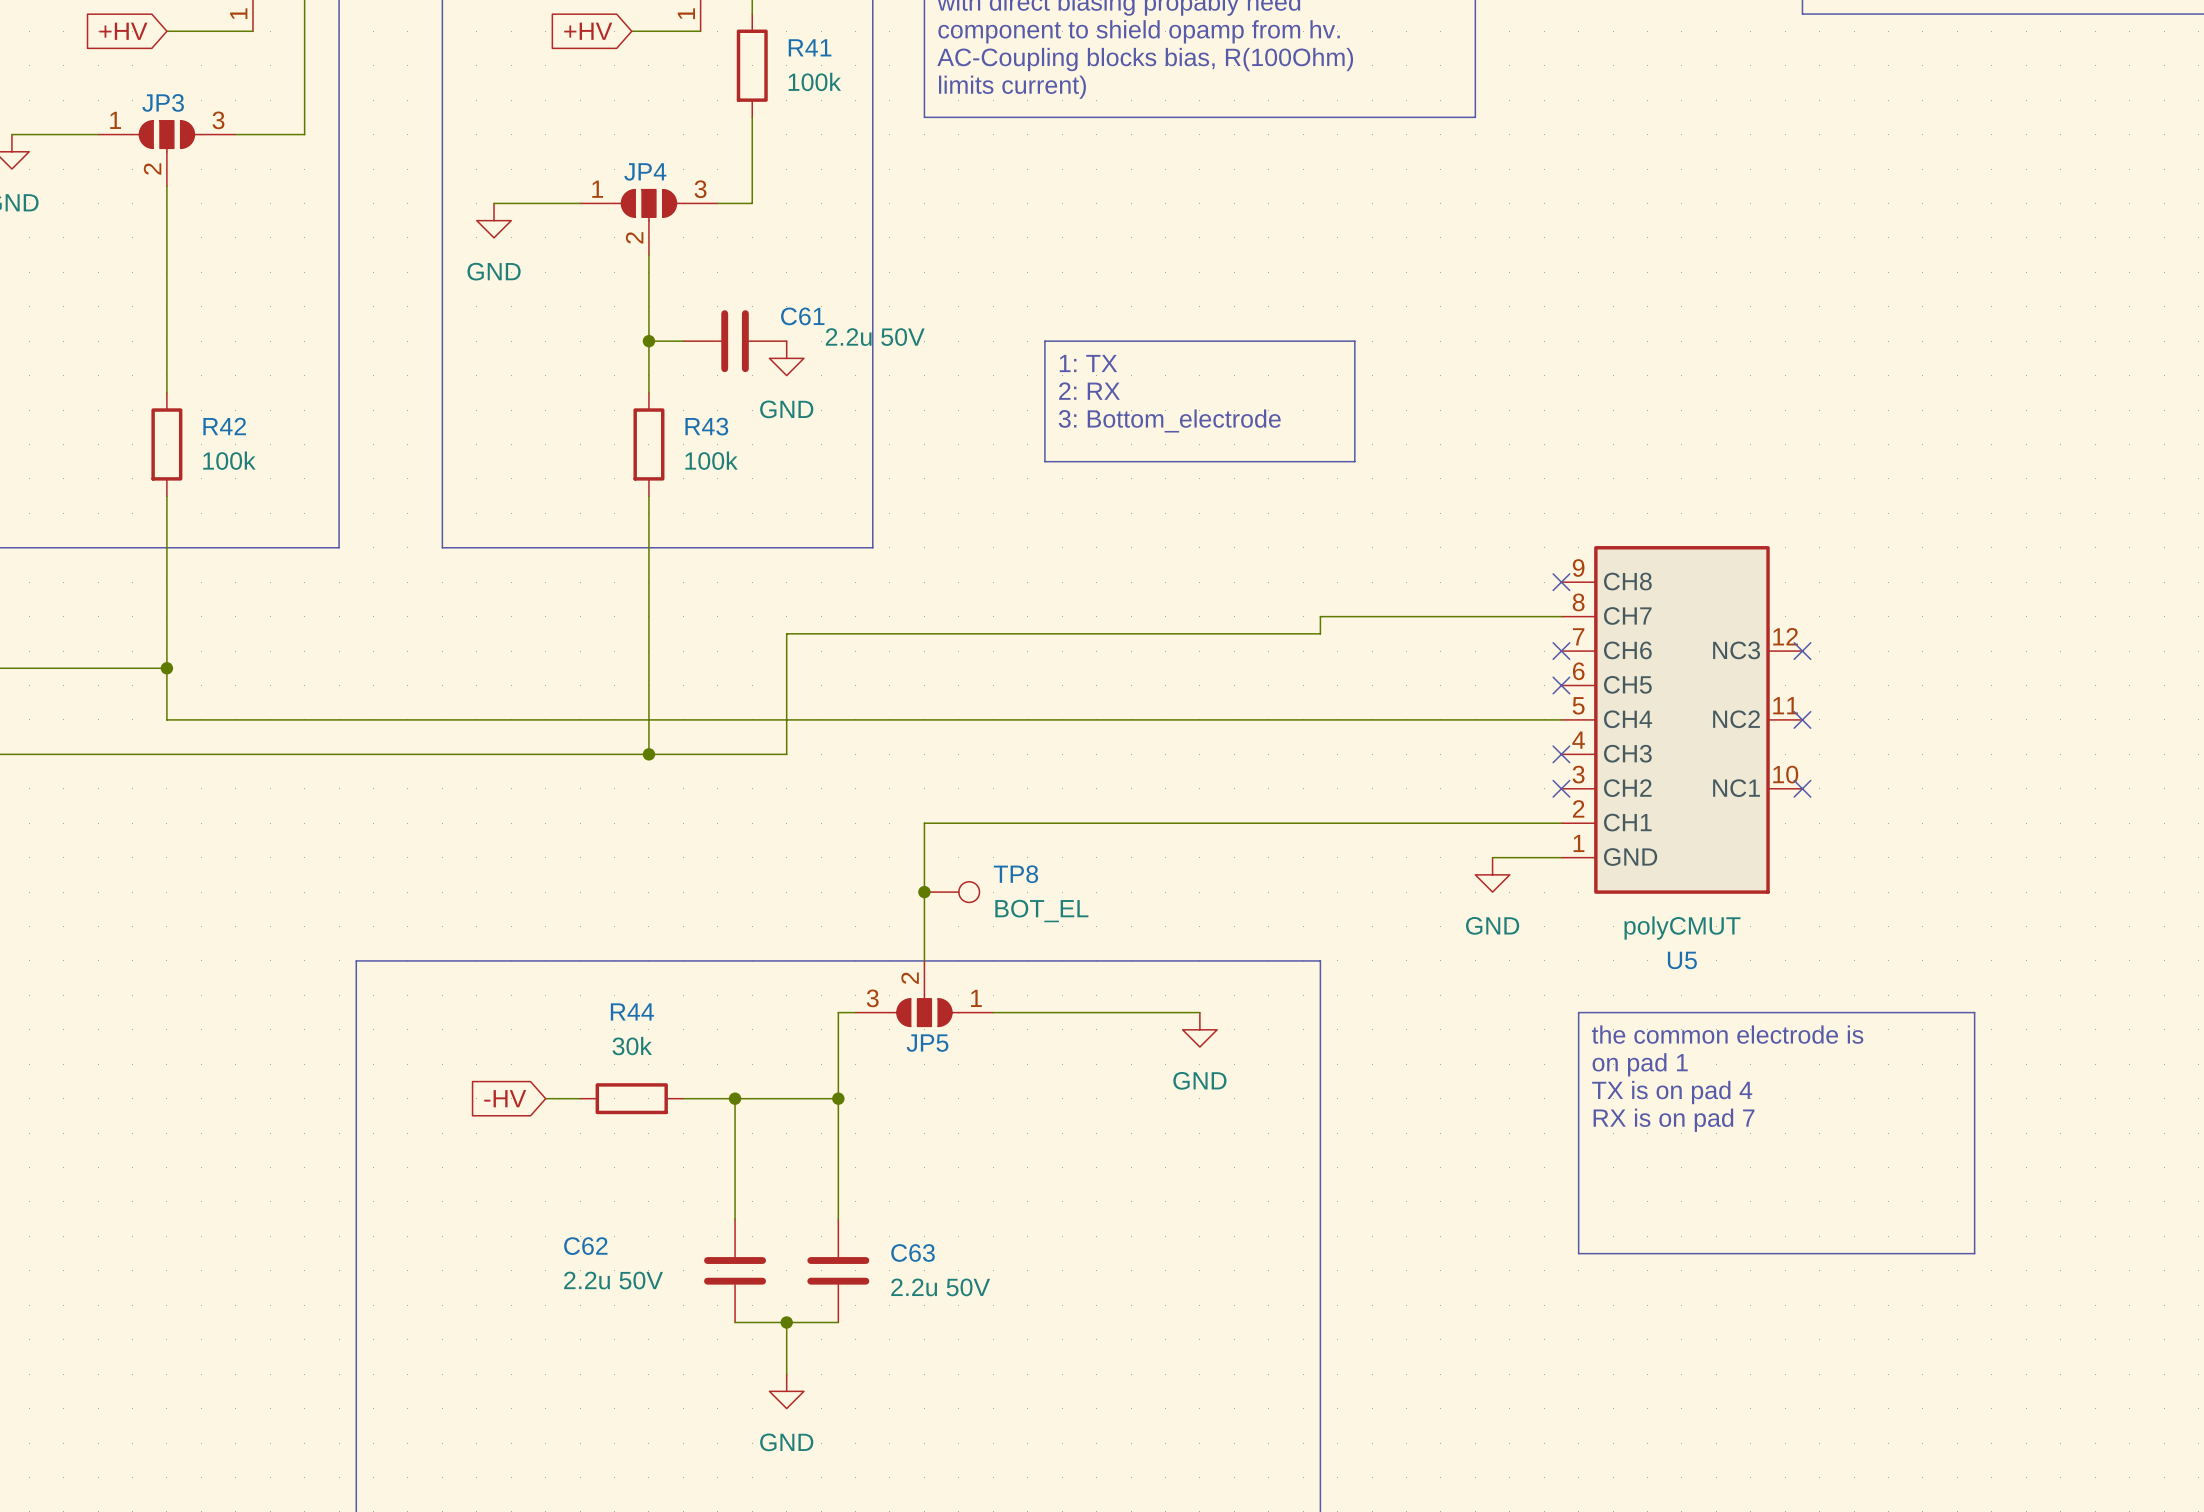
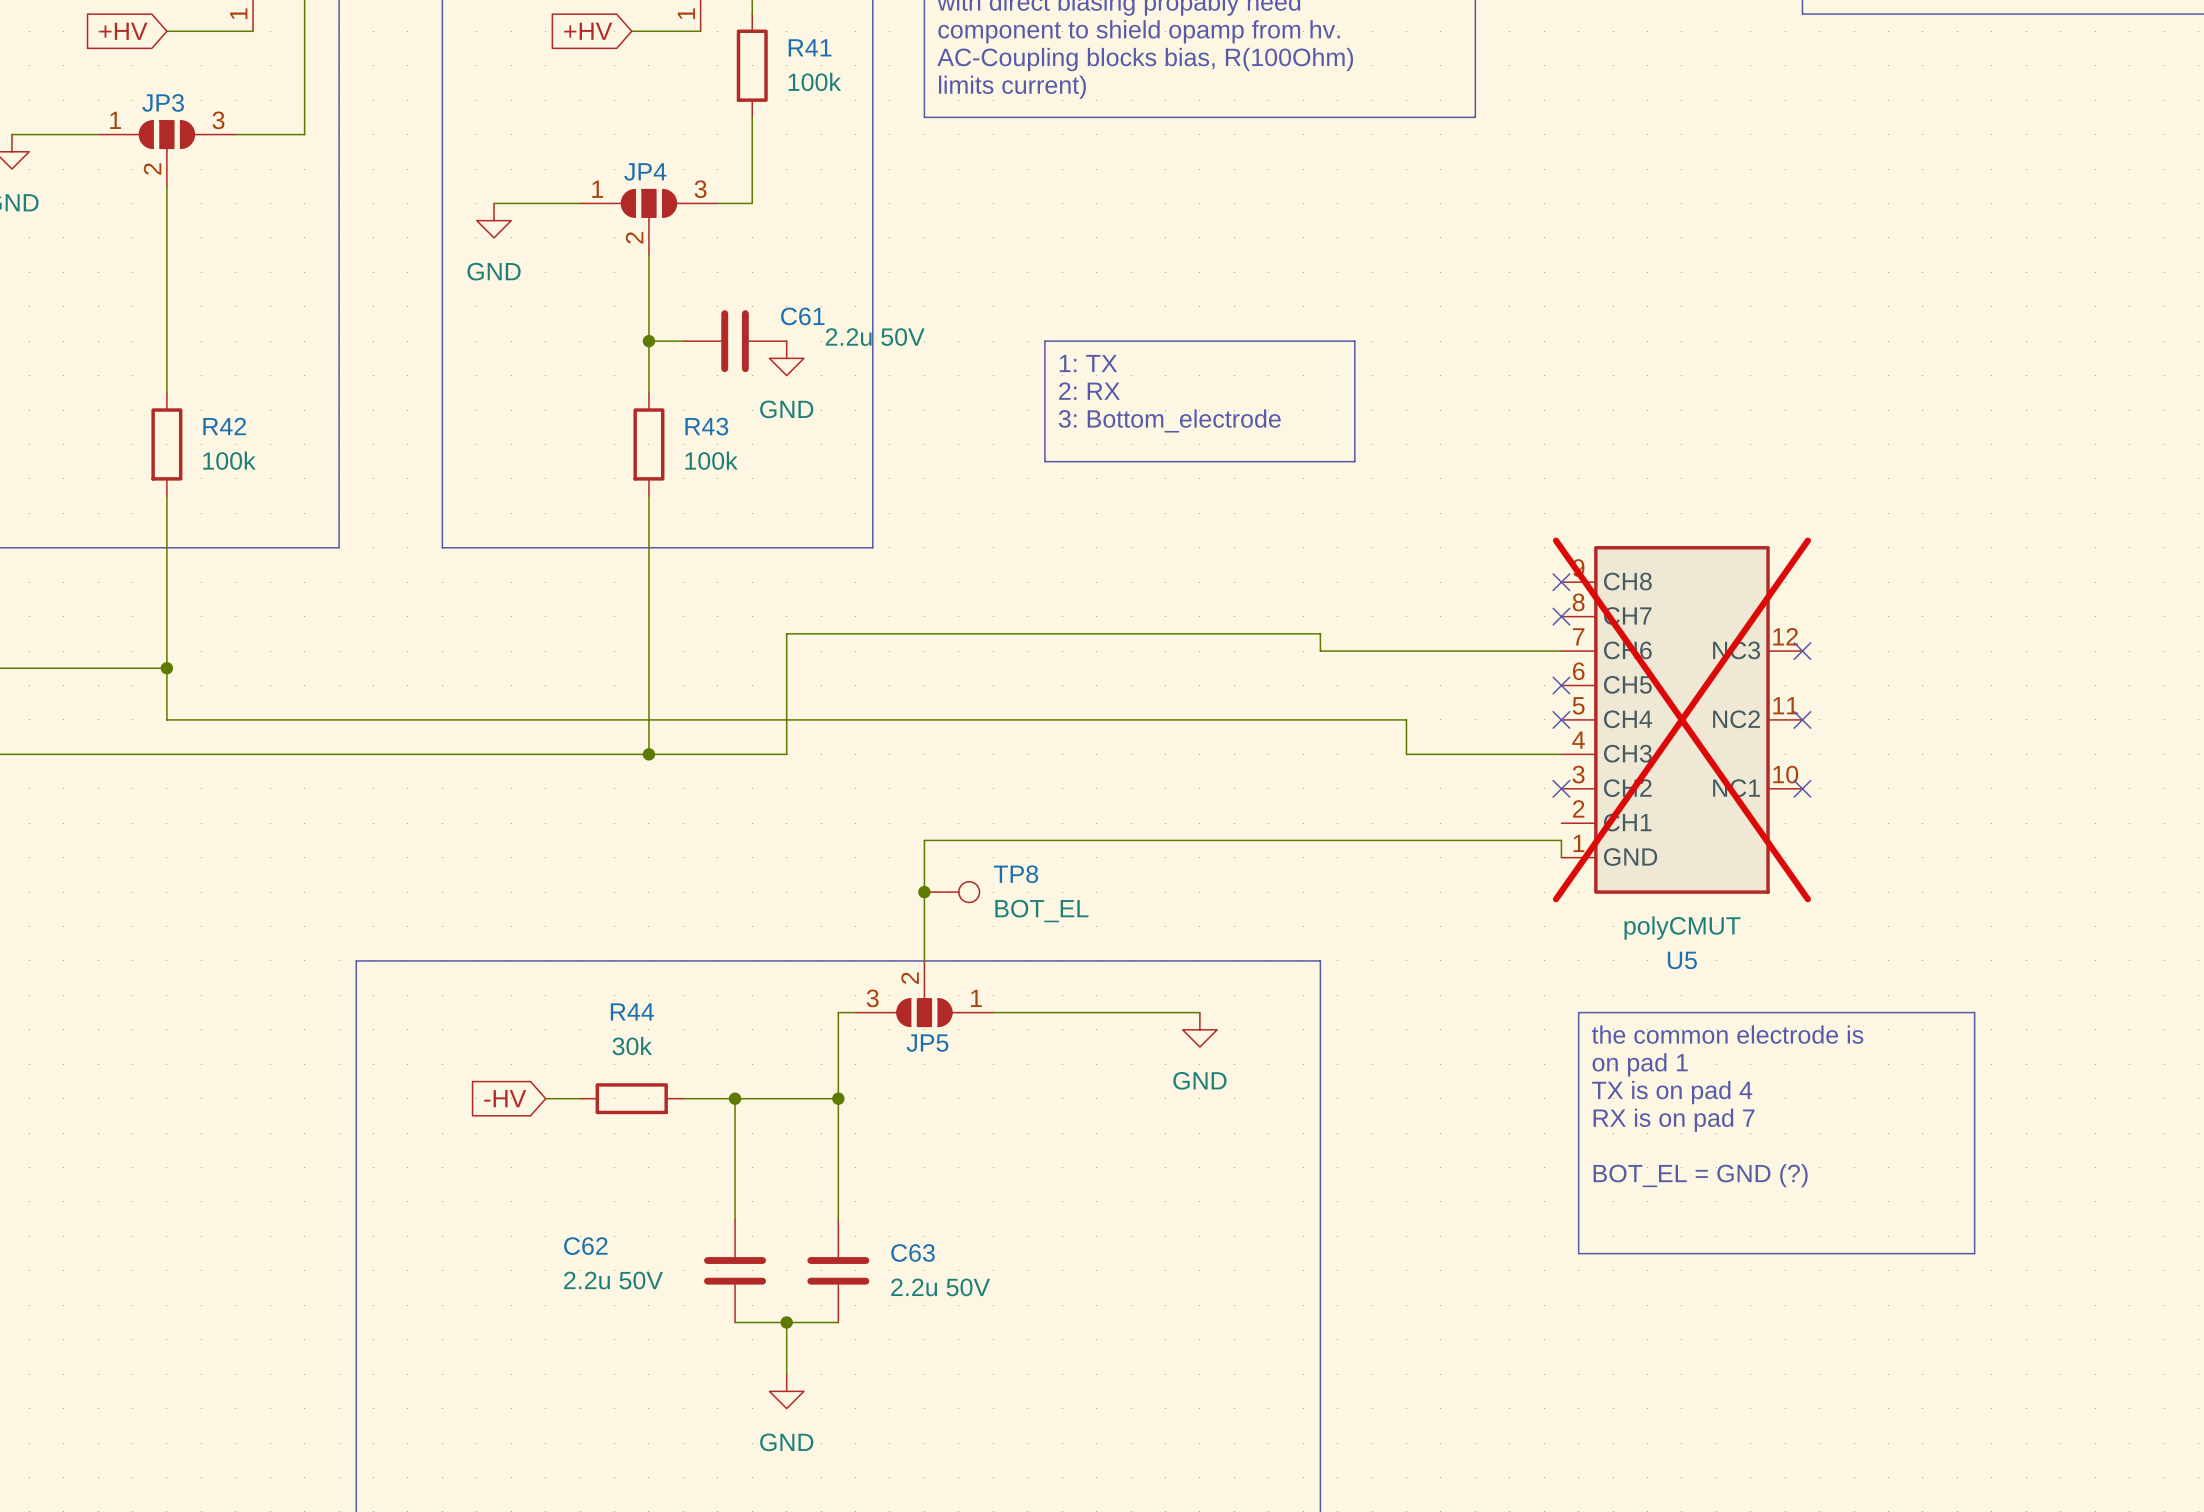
wire: (1561, 616) (1320, 616) (1320, 633) -> (1561, 651) (1320, 651) (1320, 633)
no-connect mark: none -> (1561, 616)
no-connect mark: (1561, 651) -> none
wire: (1406, 719) (1561, 719) -> (1406, 719) (1406, 754) (1561, 754)
no-connect mark: none -> (1561, 719)
U5 do-not-place cross: none -> (1681, 719)
no-connect mark: (1561, 754) -> none
wire: (1561, 823) (924, 823) (924, 840) -> (1561, 857) (1561, 840) (924, 840)
wire: (1492, 857) (1561, 857) -> none
power symbol: GND (1492, 874) -> none
text: none -> BOT_EL = GND (?) (1700, 1175)

